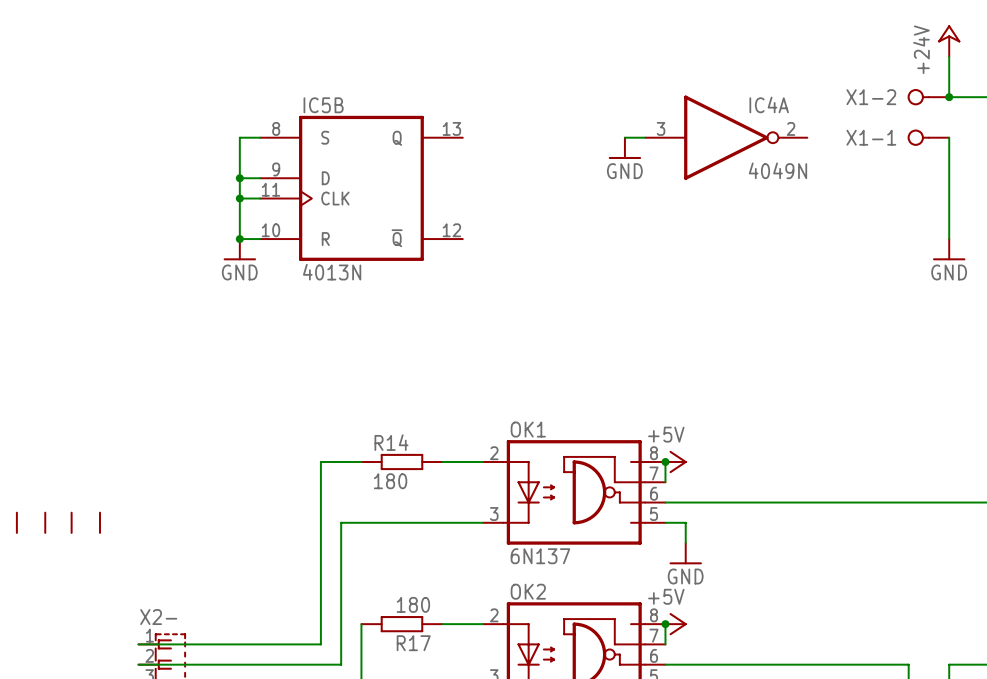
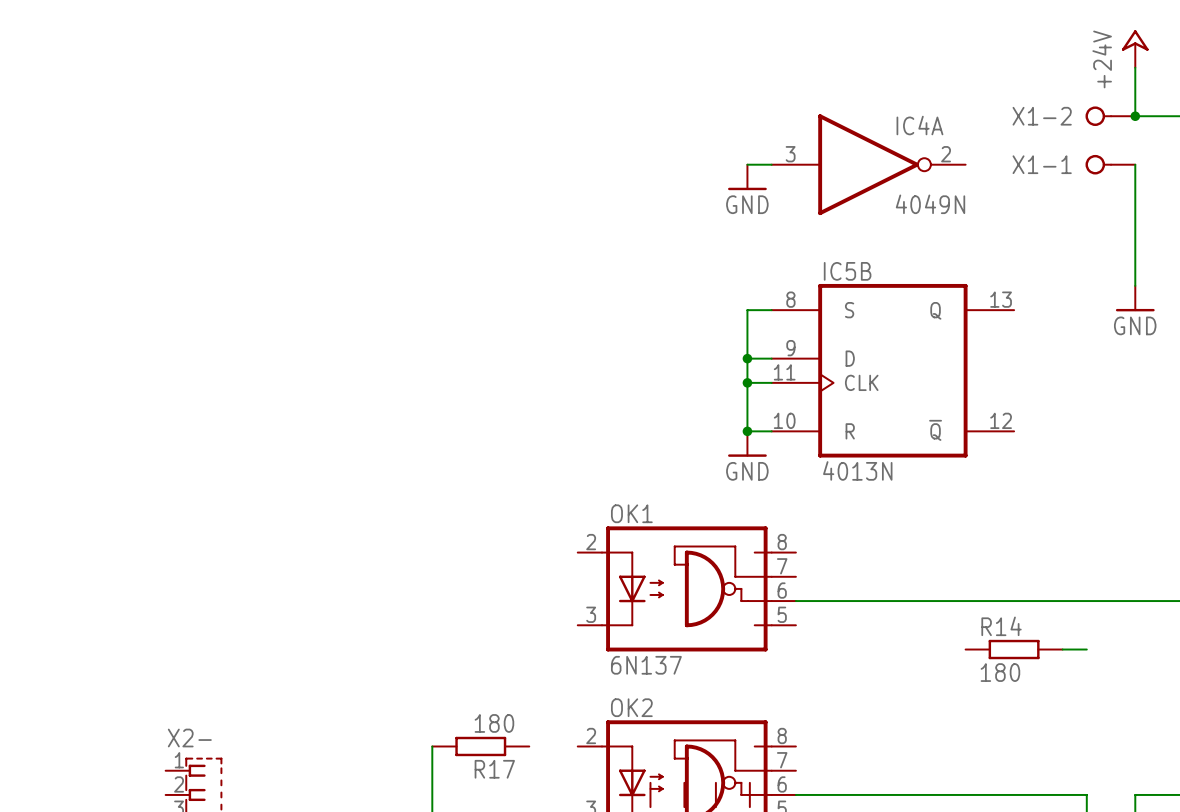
wire: (260, 137) (239, 137) (239, 239) (260, 239) -> none
wire: (239, 178) (260, 178) -> none
junction: (239, 178) -> none
IC5B position: (361, 188) -> (892, 370)
wire: (239, 198) (260, 198) -> none
junction: (239, 198) -> none
junction: (239, 239) -> none
power symbol: GND (239, 249) -> none
wire: none -> (771, 310) (747, 310) (747, 431) (771, 431)
wire: none -> (747, 358) (771, 358)
junction: none -> (747, 358)
wire: none -> (747, 382) (771, 382)
junction: none -> (747, 382)
junction: none -> (747, 431)
power symbol: none -> GND (747, 444)
wire: (361, 461) (320, 461) (320, 644) (138, 644) -> none
R14 position: (401, 461) -> (1014, 649)
wire: (442, 461) (483, 461) -> none
wire: (665, 461) (665, 482) -> none
junction: (665, 461) -> none
power symbol: +5V (676, 461) -> none
part: (16, 522) -> none
part: (45, 522) -> none
part: (71, 522) -> none
part: (99, 522) -> none
wire: (483, 522) (341, 522) (341, 664) (138, 664) -> none
wire: (665, 522) (685, 522) (685, 543) -> none
wire: none -> (1062, 649) (1086, 649)
power symbol: GND (685, 553) -> none
wire: (442, 624) (483, 624) -> none
wire: (665, 624) (665, 644) -> none
junction: (665, 624) -> none
power symbol: +5V (676, 624) -> none
part: none -> (650, 794)
part: none -> (684, 794)
part: none -> (715, 794)
part: none -> (749, 794)

